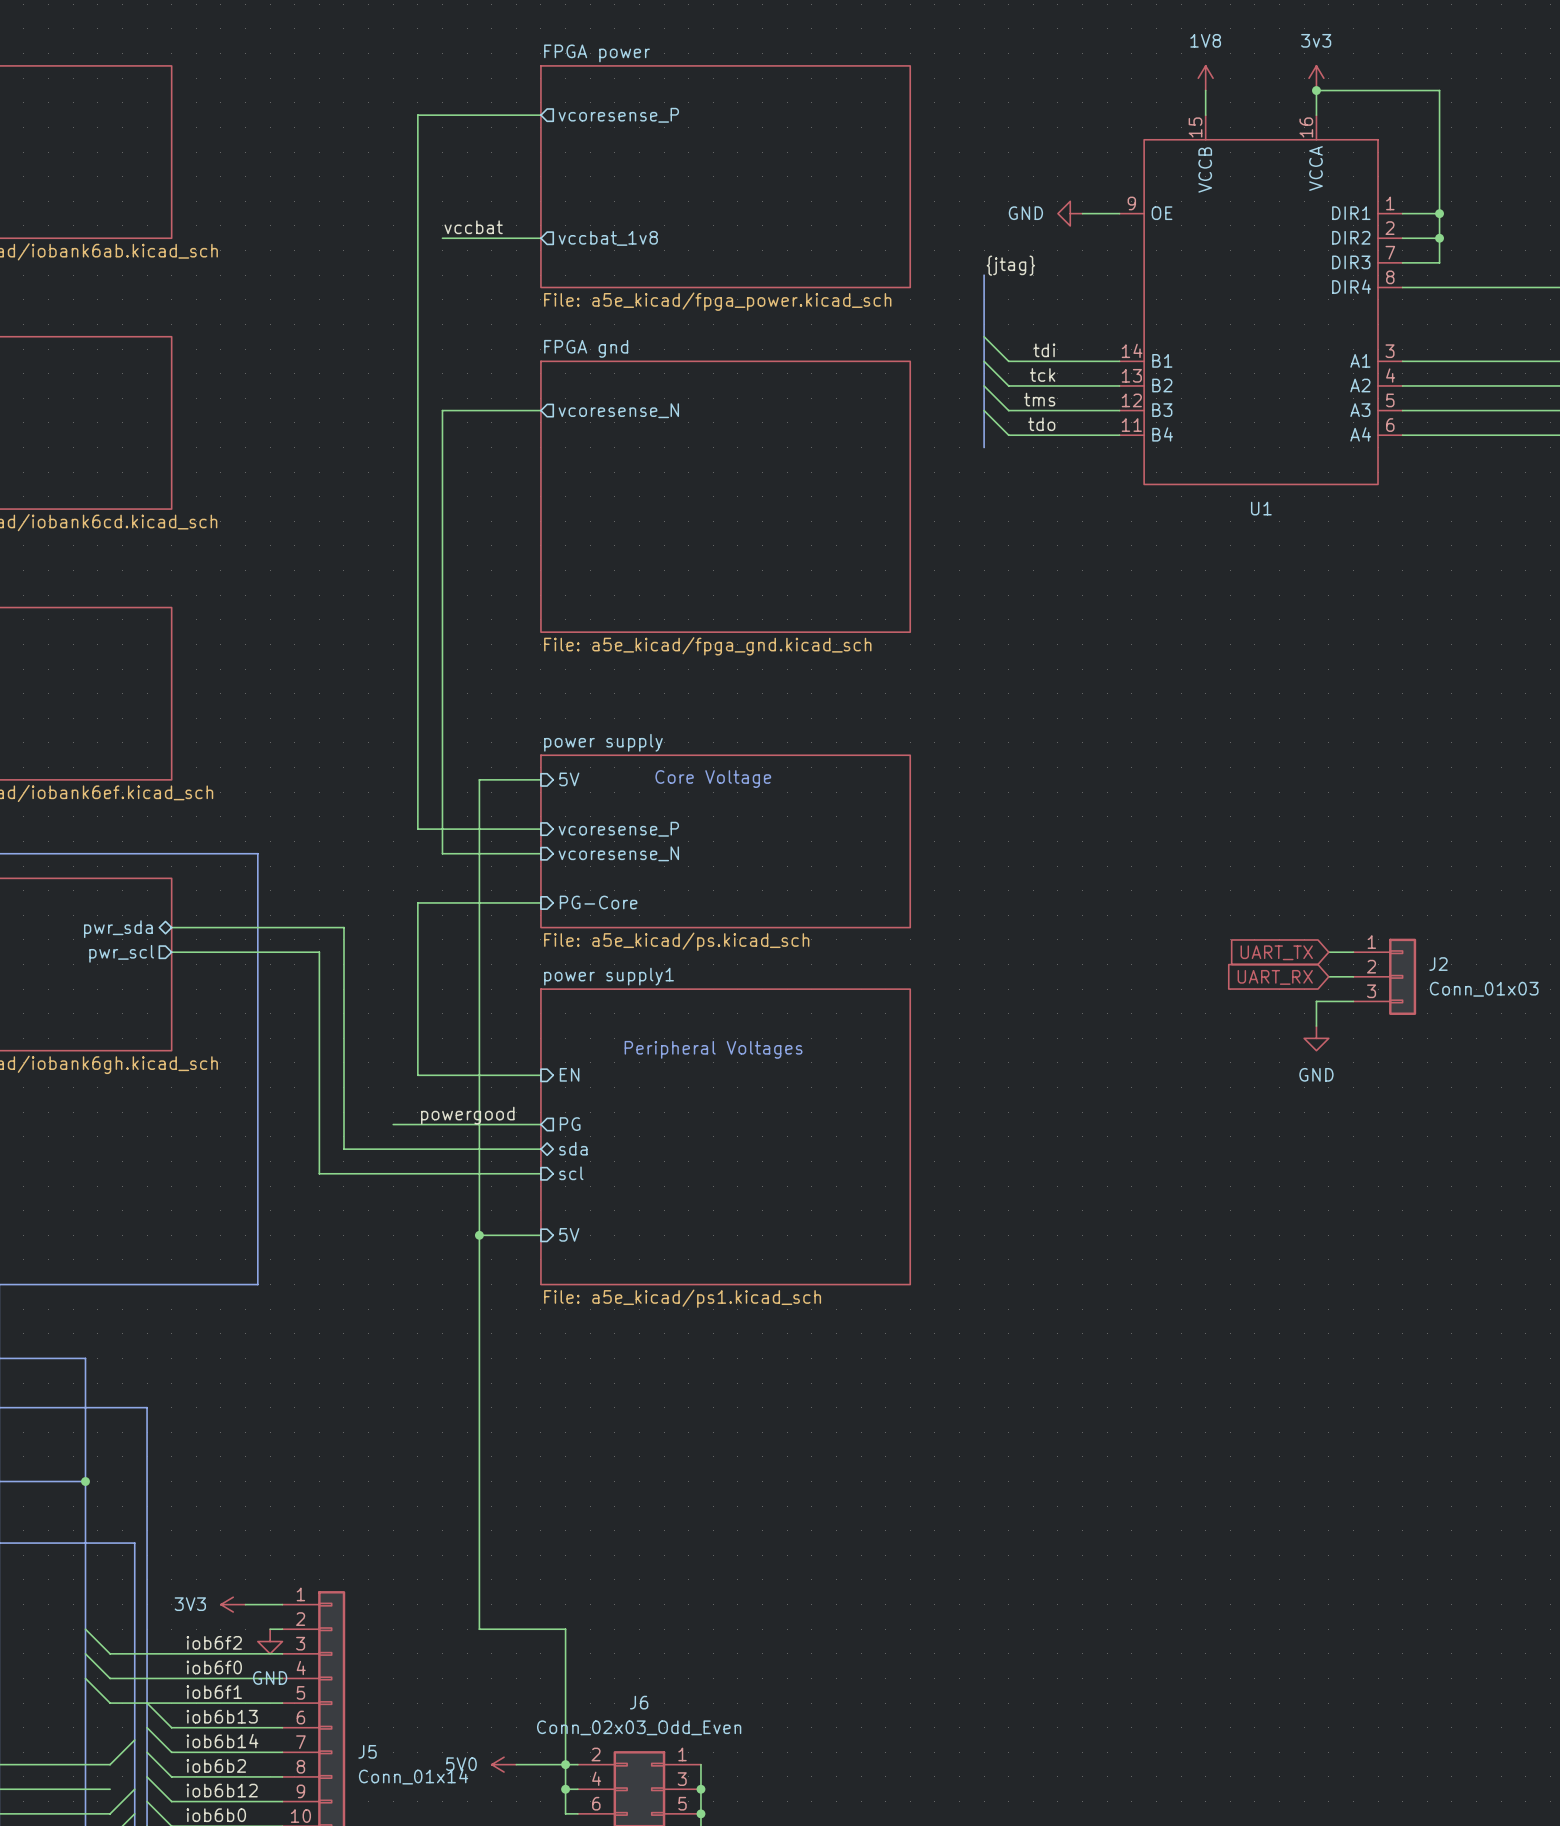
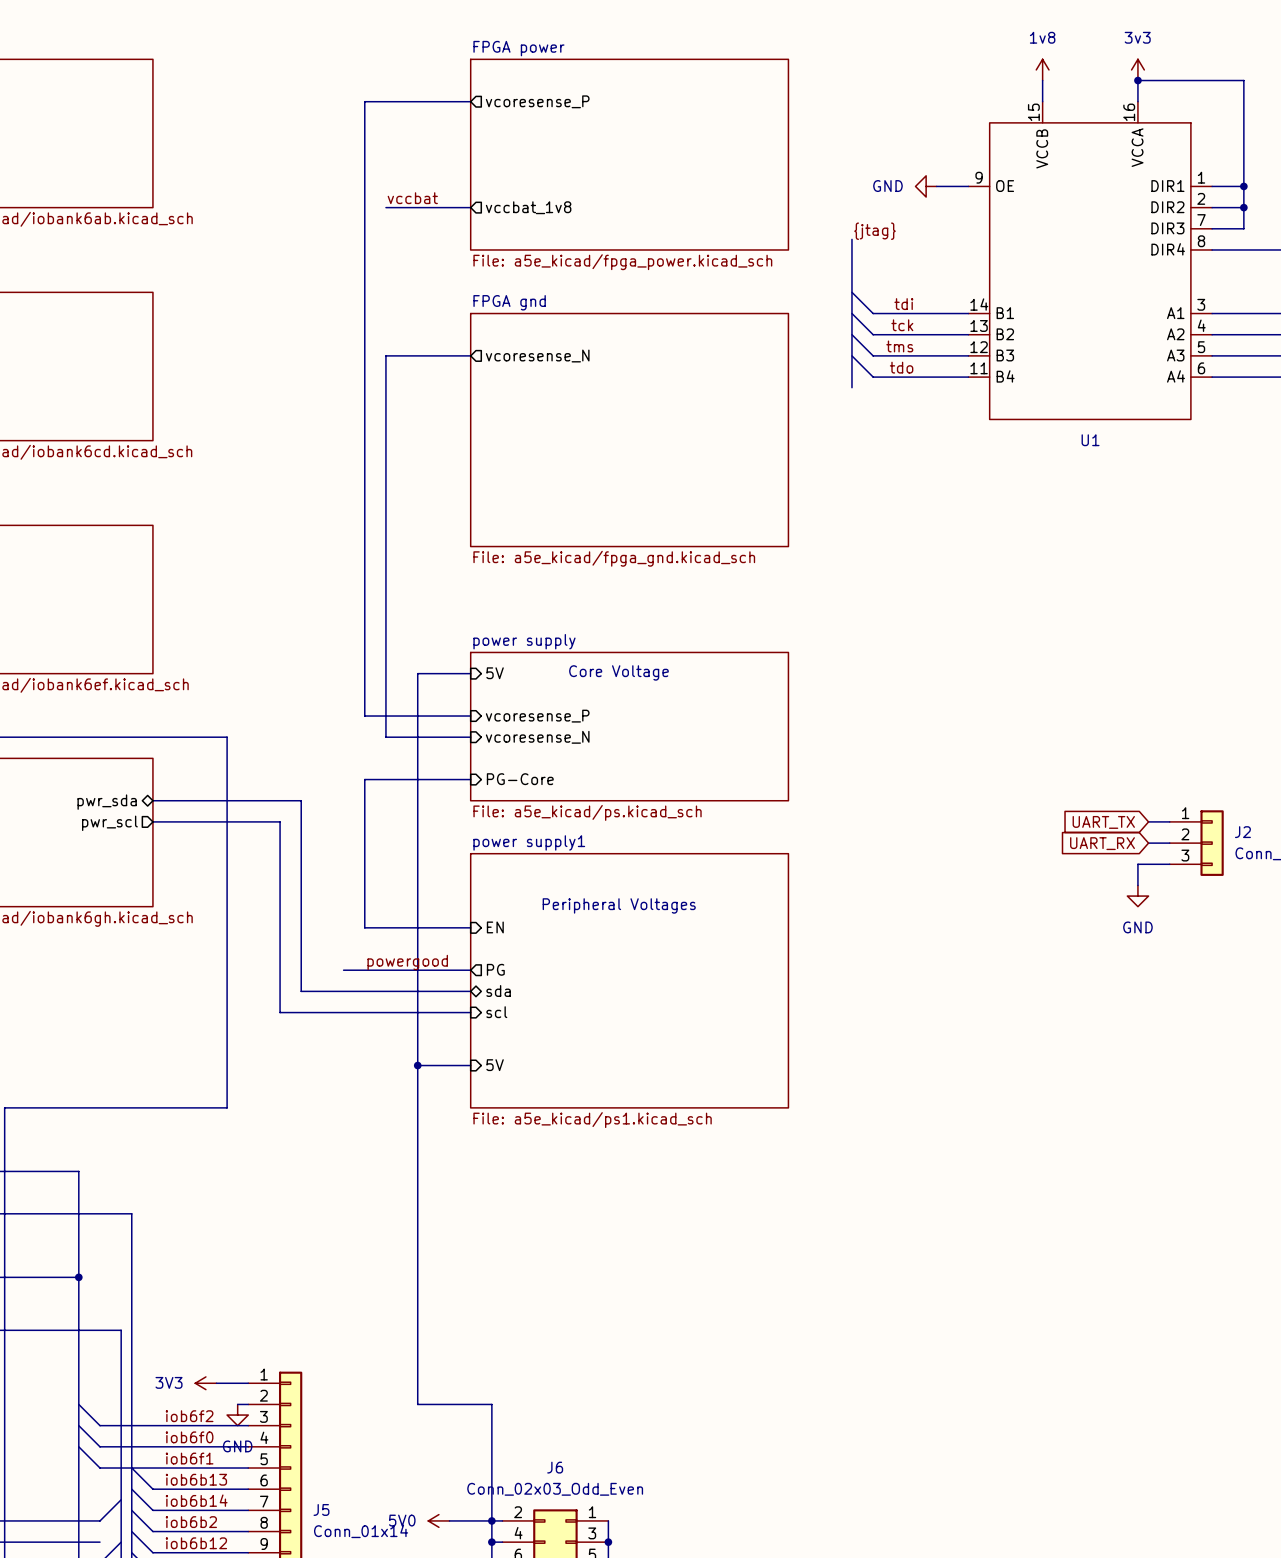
power symbol: 1V8 (1205, 78) -> 1v8 (1042, 69)

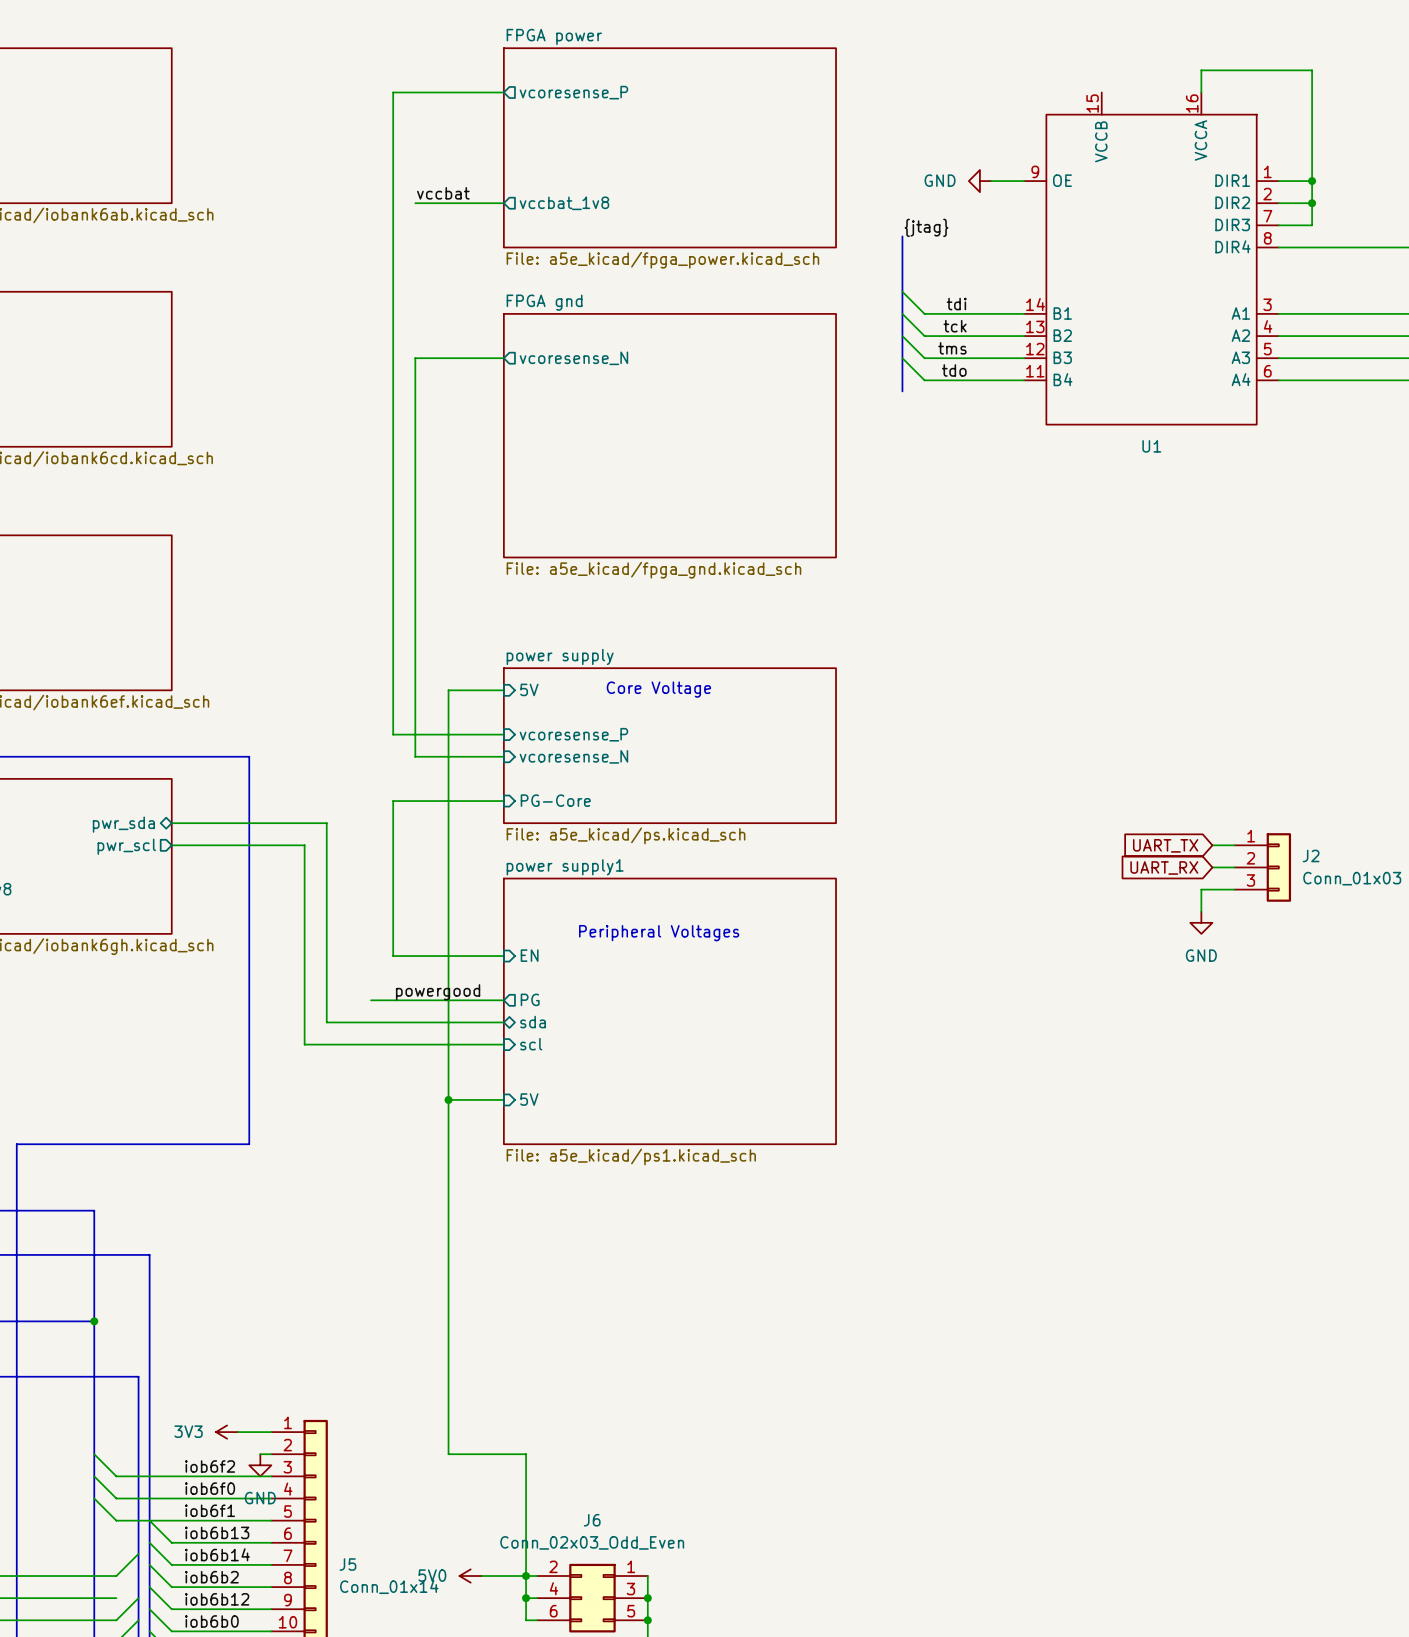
power symbol: 1v8 (1042, 69) -> none
power symbol: 3v3 (1137, 69) -> none
wire: (1042, 80) (1042, 101) -> none
junction: (1137, 80) -> none

